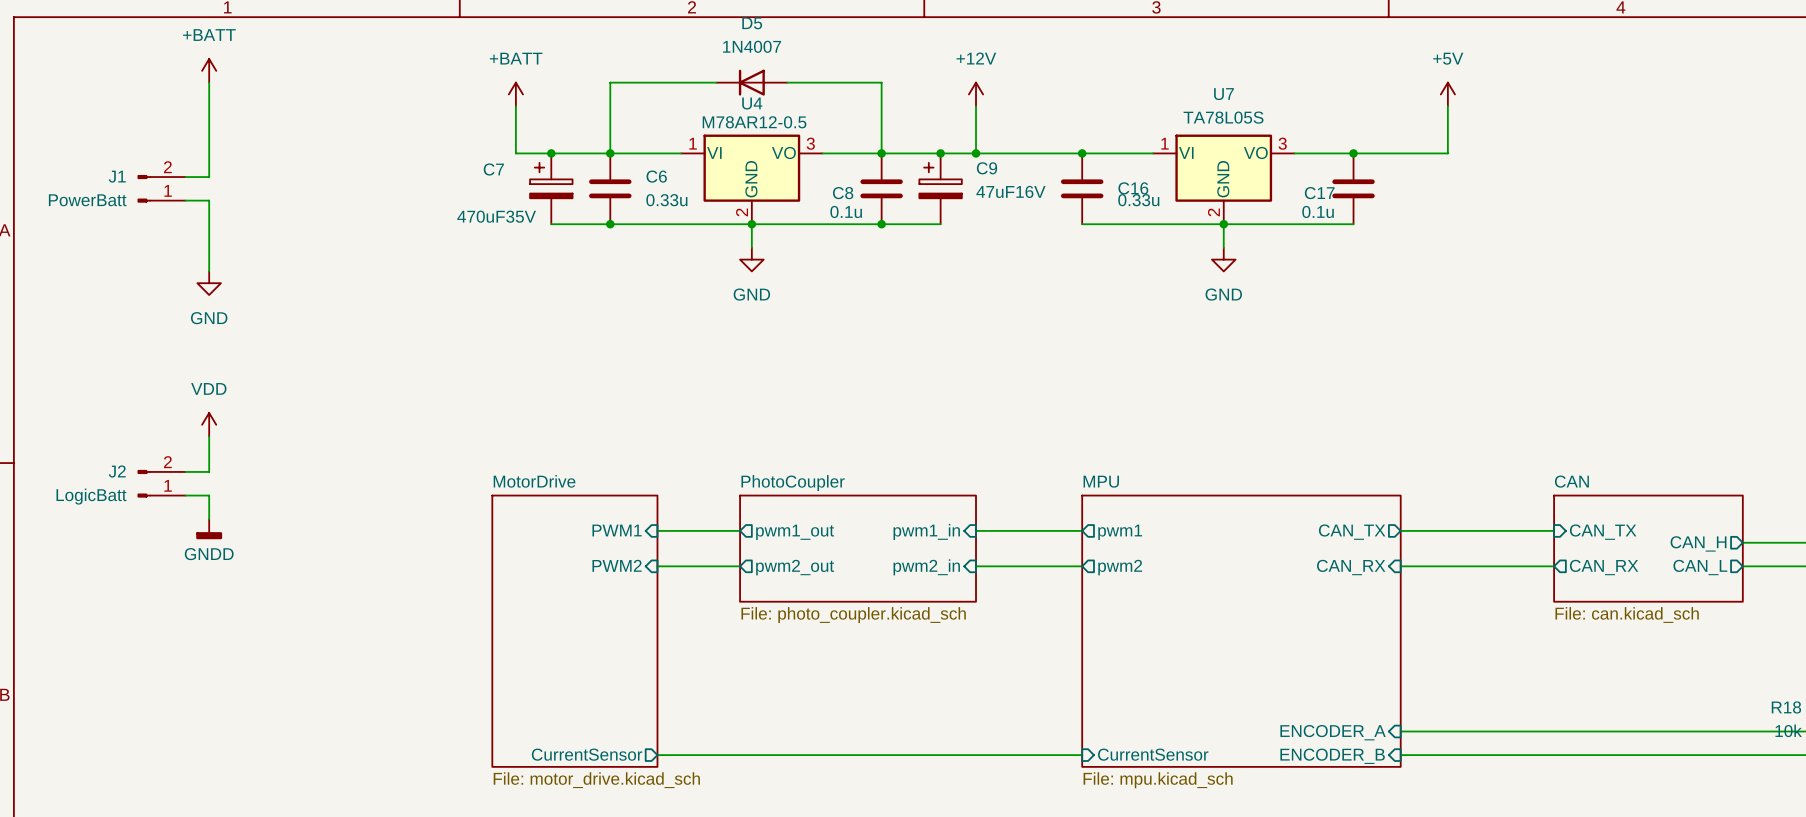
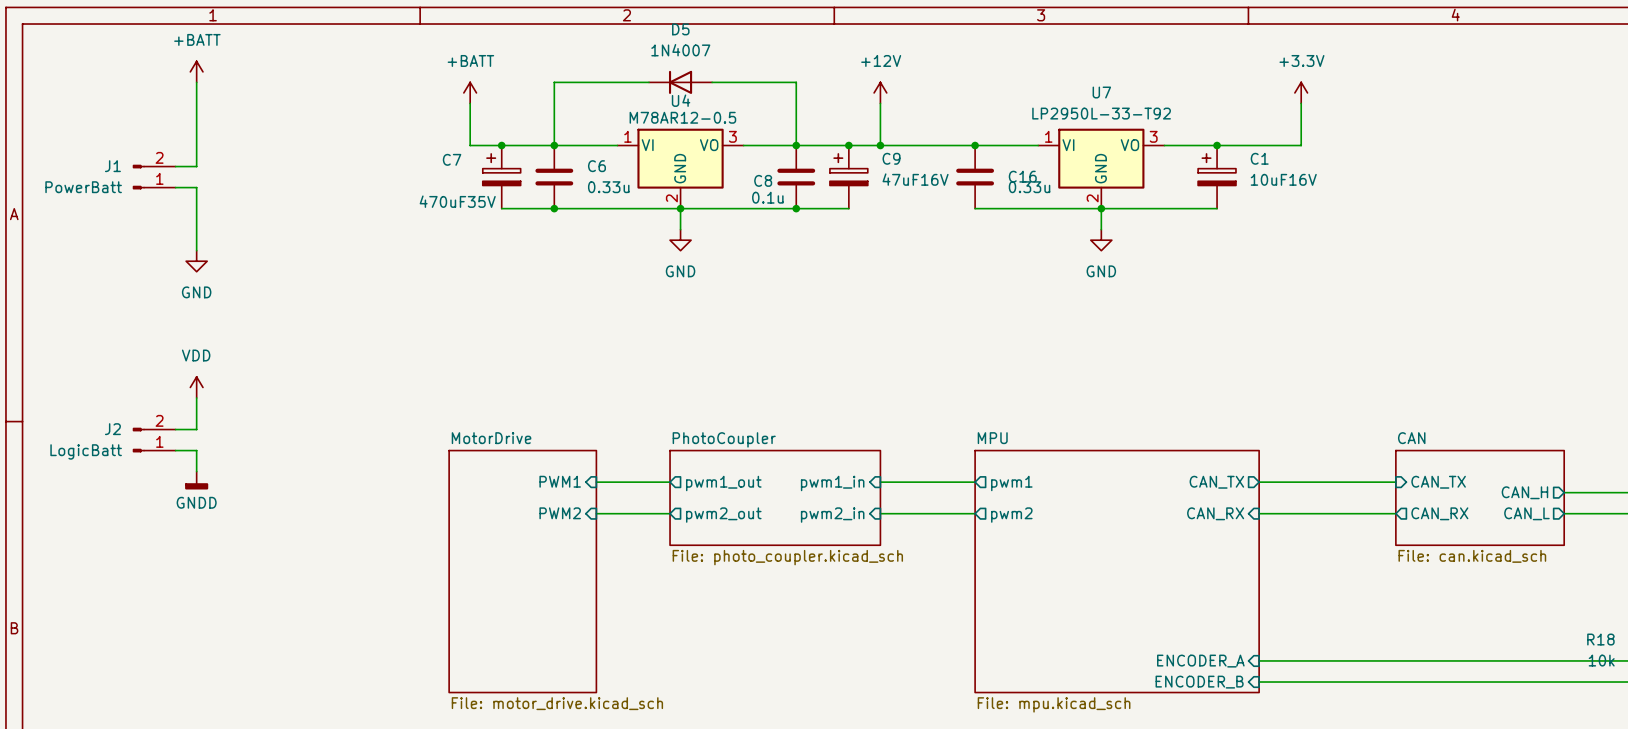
power symbol: +5V (1447, 94) -> +3.3V (1301, 92)
U7 value: TA78L05S (1223, 117) -> LP2950L-33-T92 (1101, 113)
C17: 0.1u (1353, 188) -> none
C1: none -> 10uF16V (1217, 177)
sheet pin: CurrentSensor (587, 754) -> none
sheet pin: CurrentSensor (1153, 754) -> none
wire: (657, 755) (1082, 755) -> none

